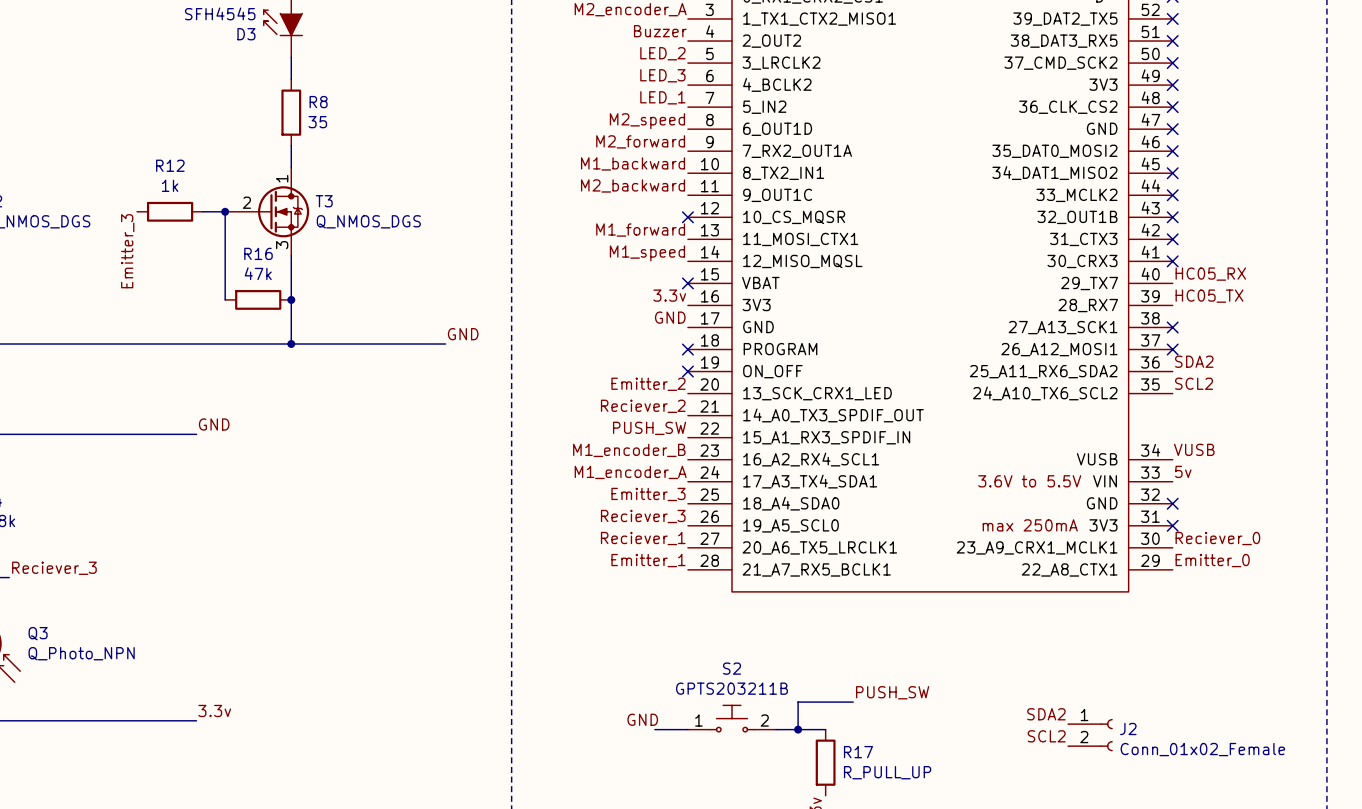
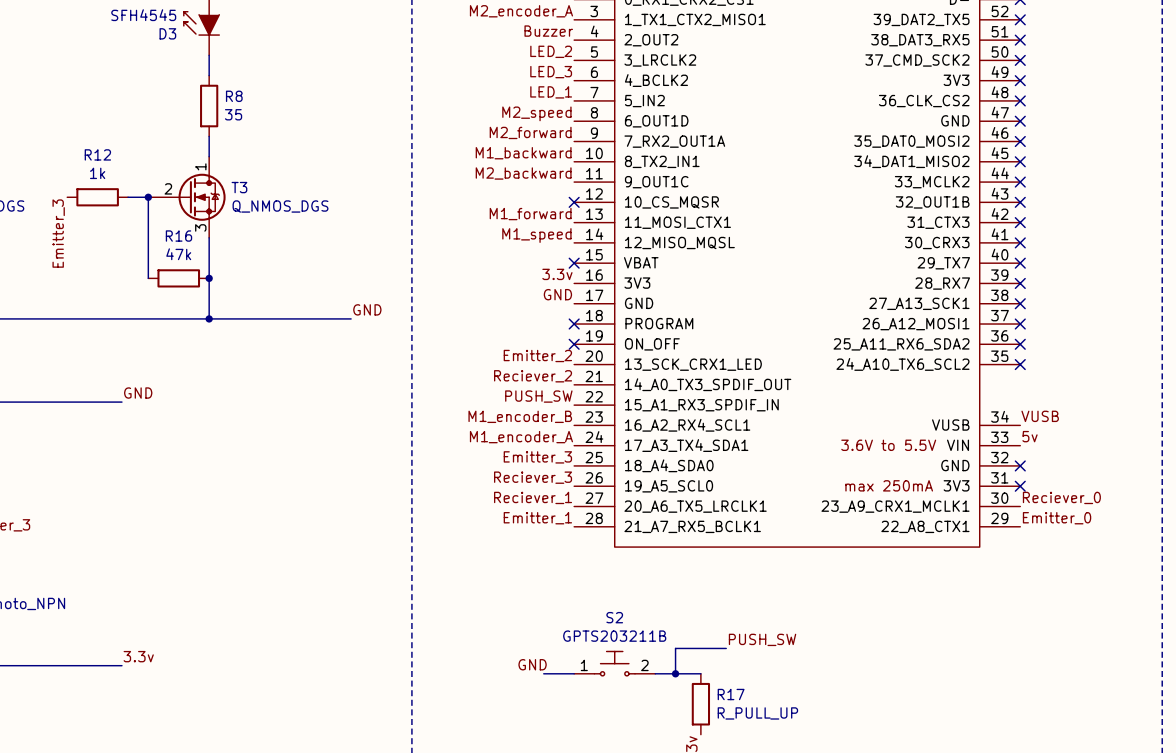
label: HC05_RX (1210, 274) -> none
no-connect mark: none -> (1020, 263)
label: HC05_TX (1209, 296) -> none
no-connect mark: none -> (1020, 283)
label: SDA2 (1194, 361) -> none
no-connect mark: none -> (1020, 344)
label: SCL2 (1194, 383) -> none
no-connect mark: none -> (1020, 364)
label: SDA2 (1046, 714) -> none
J2: Conn_01x02_Female (1090, 735) -> none
label: SCL2 (1046, 736) -> none

